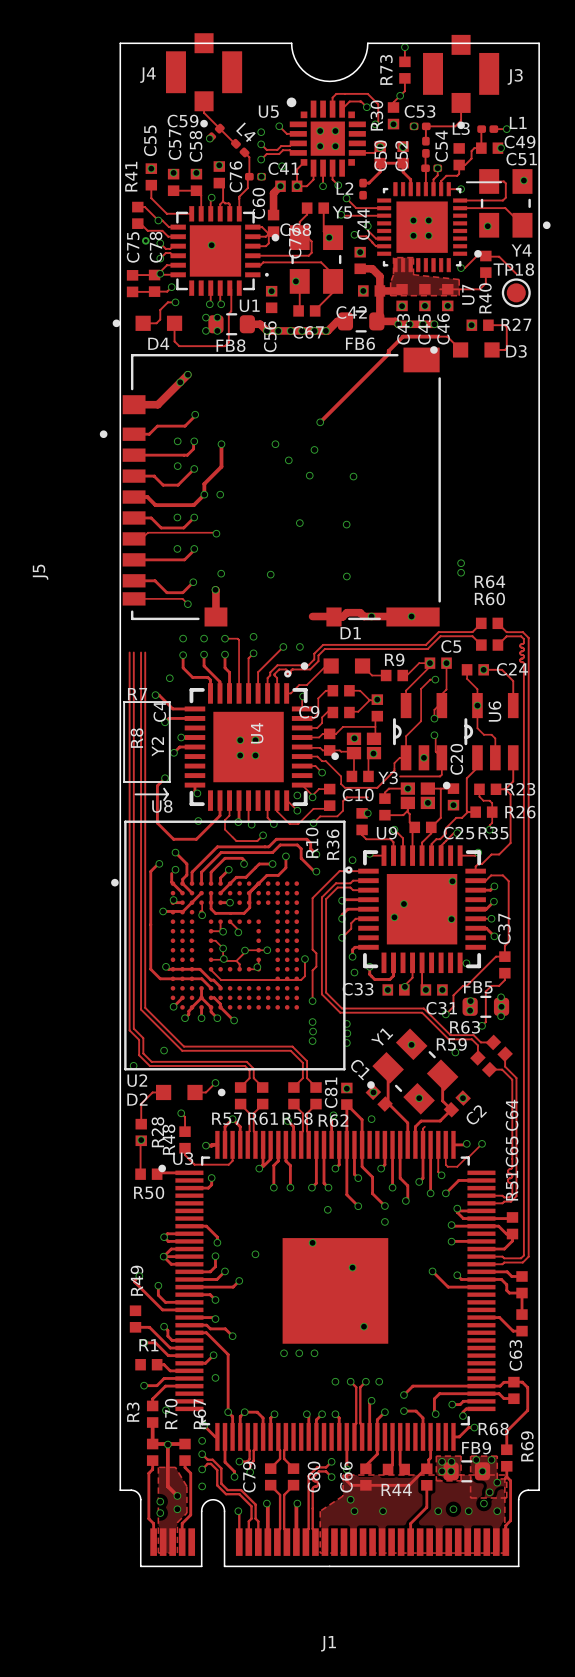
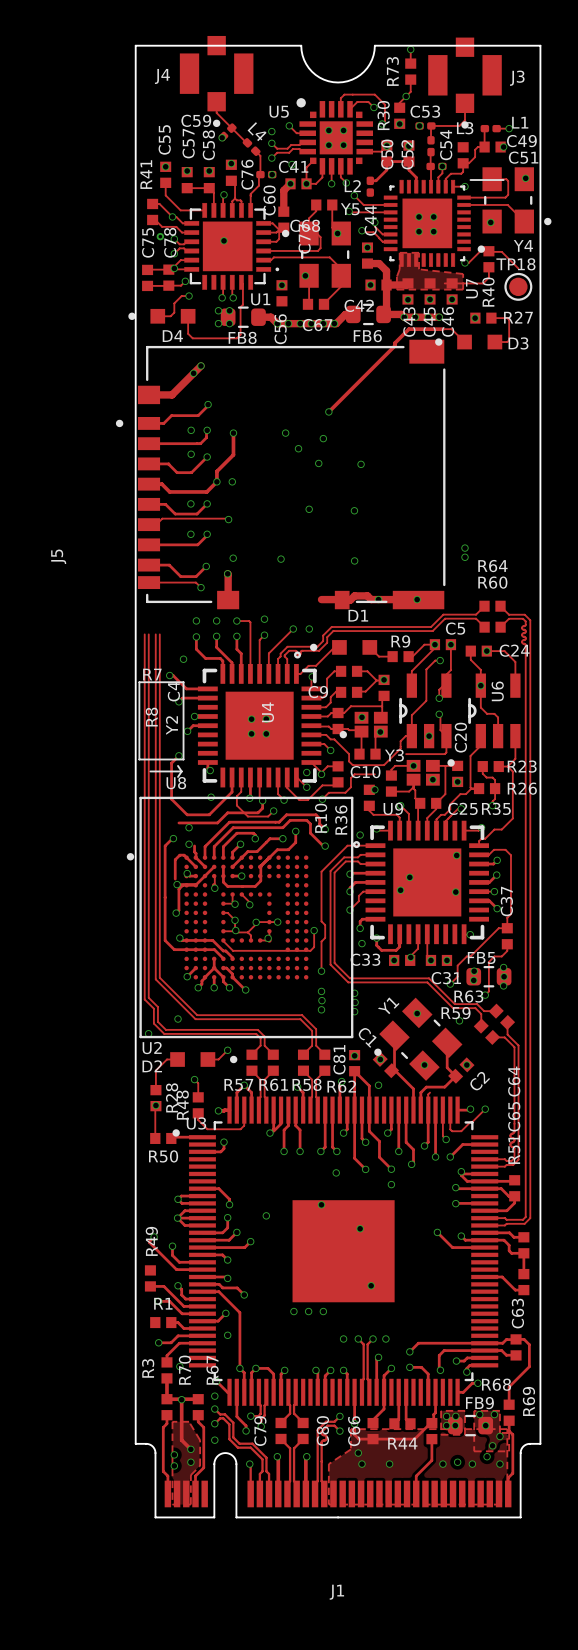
track: none -> (262, 800) (262, 808) (258, 812) (227, 812) (217, 822) (178, 822)
track: (175, 852) (186, 864) (186, 875) (182, 879) -> (194, 845) (196, 853)
track: (171, 873) (171, 882) -> (175, 879) (175, 859) (179, 855) (185, 856)
track: none -> (195, 885) (182, 885) (178, 889) (178, 910) (176, 913)
via: none -> (176, 913)

